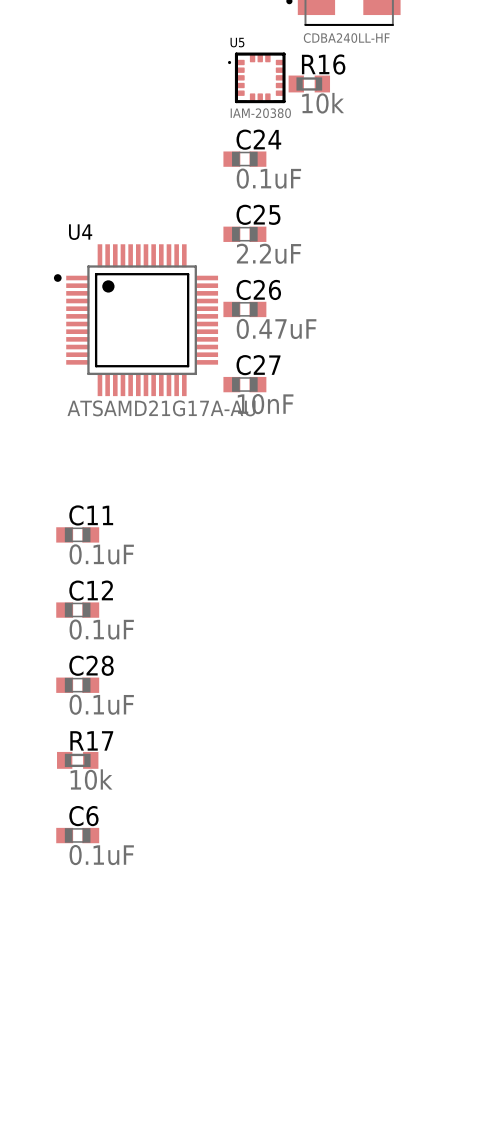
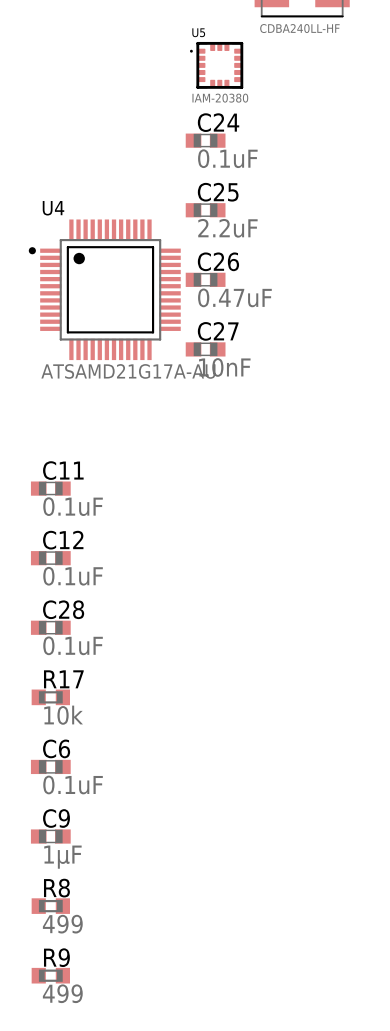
R16: 10k (309, 83) -> none
C9: none -> 1µF (50, 836)
R8: none -> 499 (50, 906)
R9: none -> 499 (50, 975)

